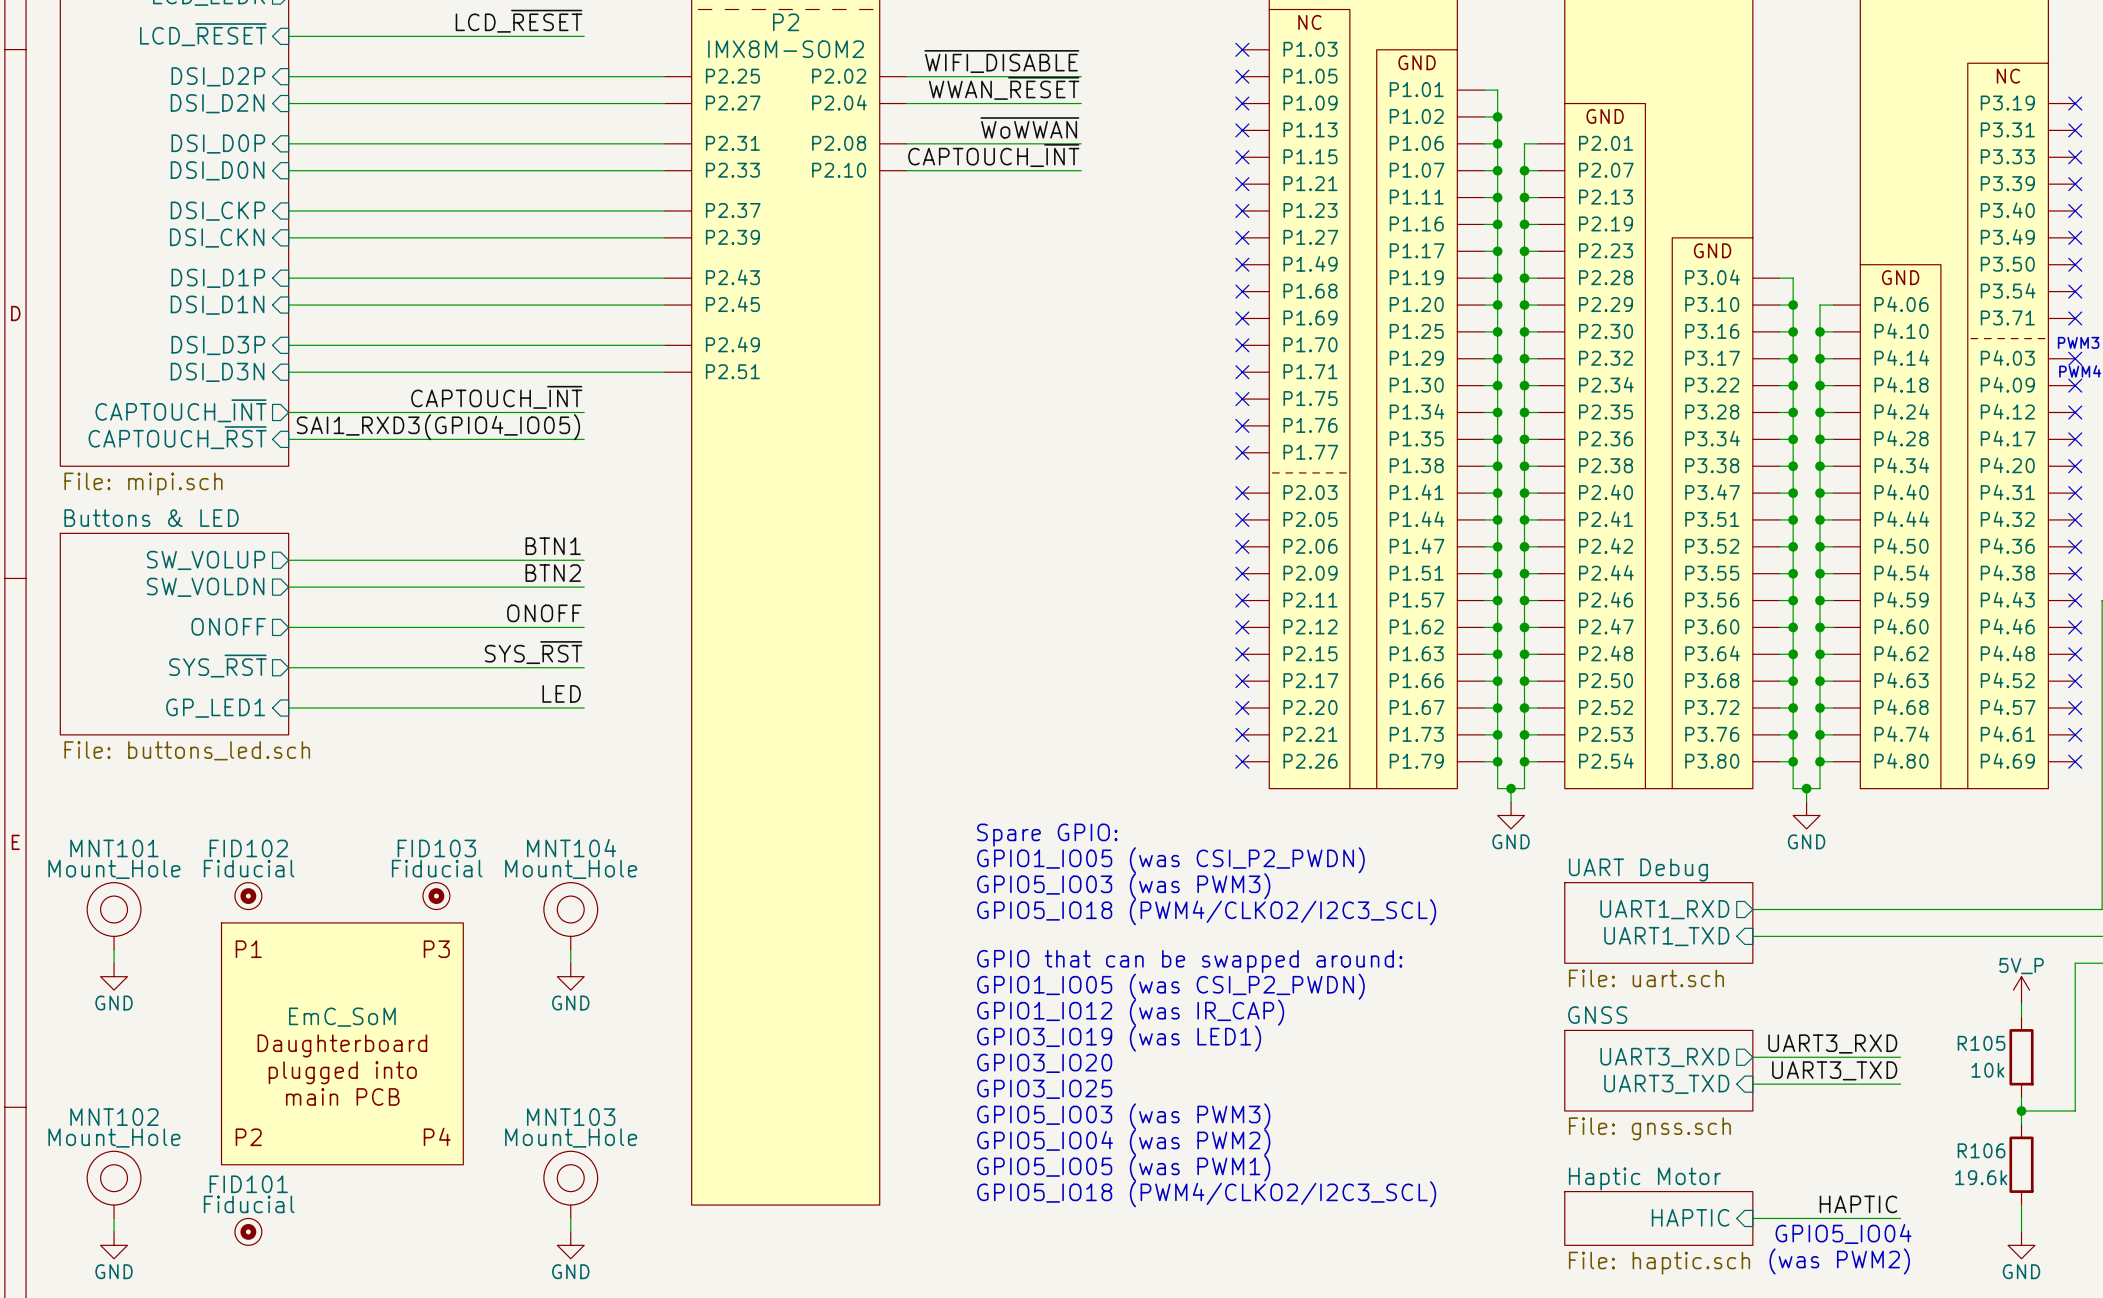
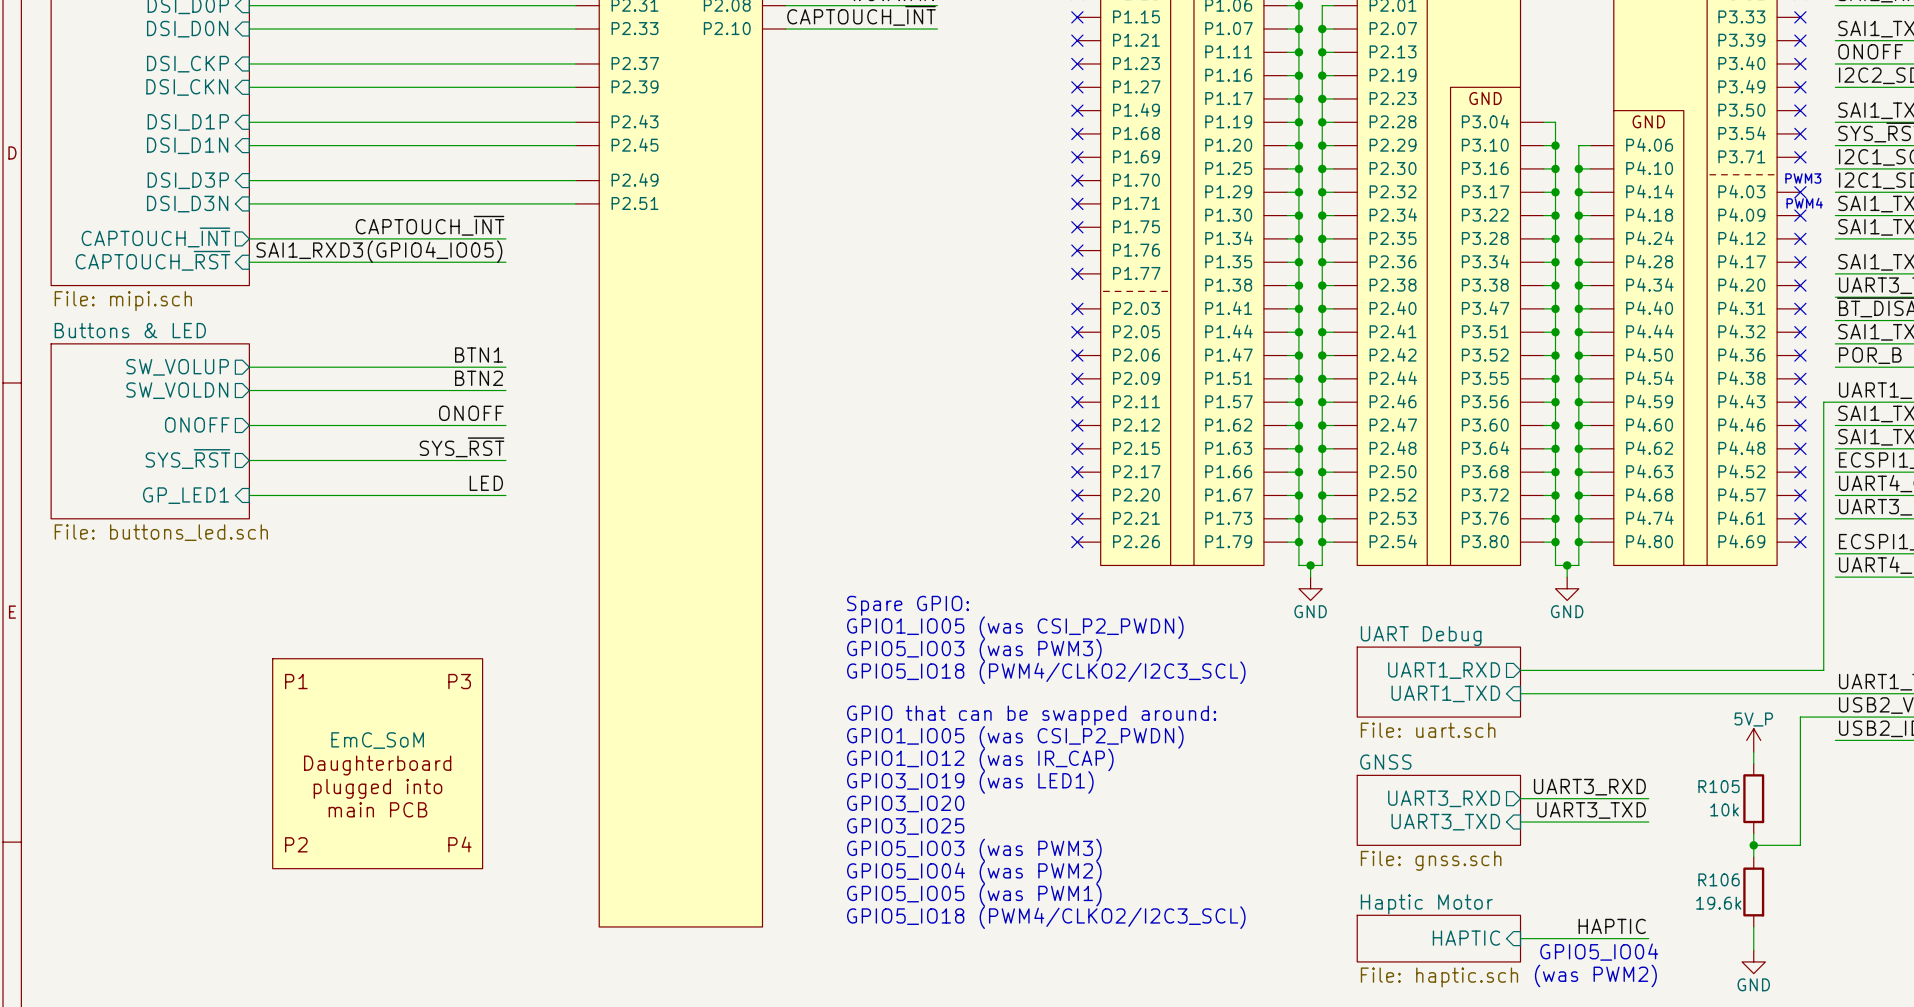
FID102: Fiducial (248, 896) -> none
FID103: Fiducial (436, 896) -> none
MNT101: Mount_Hole (114, 916) -> none
MNT104: Mount_Hole (570, 916) -> none
wire: (114, 949) (114, 963) -> none
wire: (570, 949) (570, 963) -> none
power symbol: GND (114, 976) -> none
power symbol: GND (570, 976) -> none
power symbol position: EmC_SoM (342, 1043) -> EmC_SoM (377, 763)
MNT102: Mount_Hole (114, 1184) -> none
MNT103: Mount_Hole (570, 1184) -> none
wire: (114, 1218) (114, 1231) -> none
wire: (570, 1218) (570, 1231) -> none
FID101: Fiducial (248, 1231) -> none
power symbol: GND (114, 1245) -> none
power symbol: GND (570, 1245) -> none

